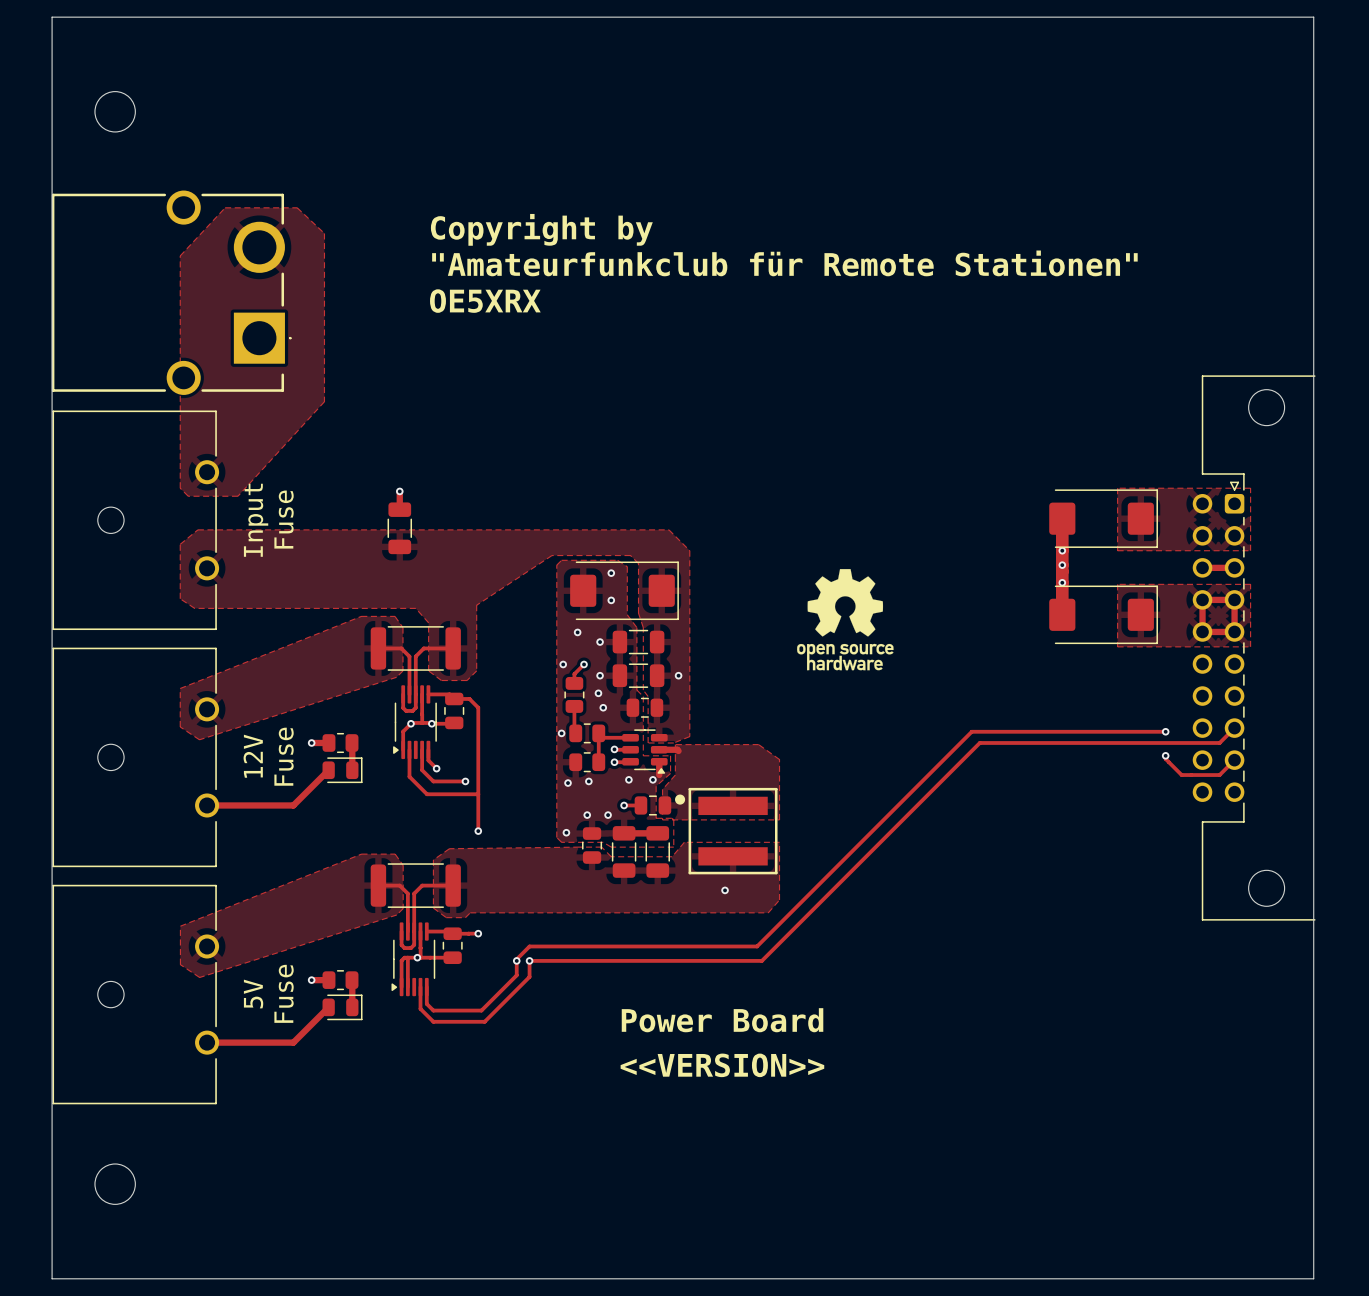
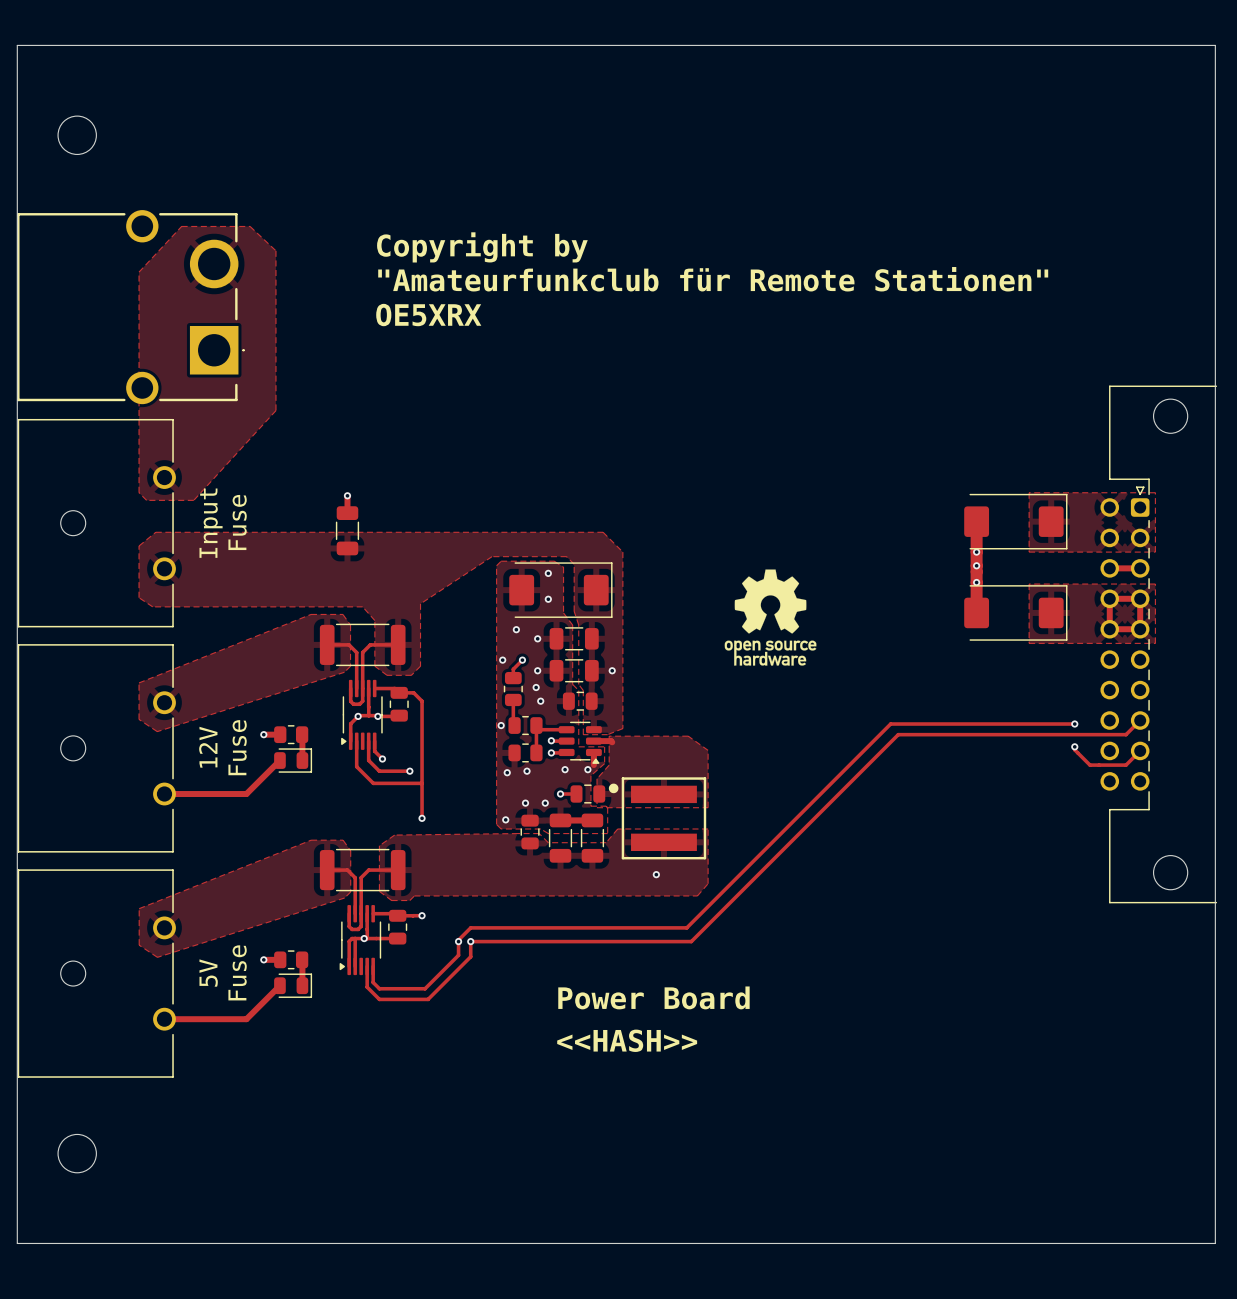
text: <<VERSION>> (722, 1065) -> <<HASH>> (627, 1040)

